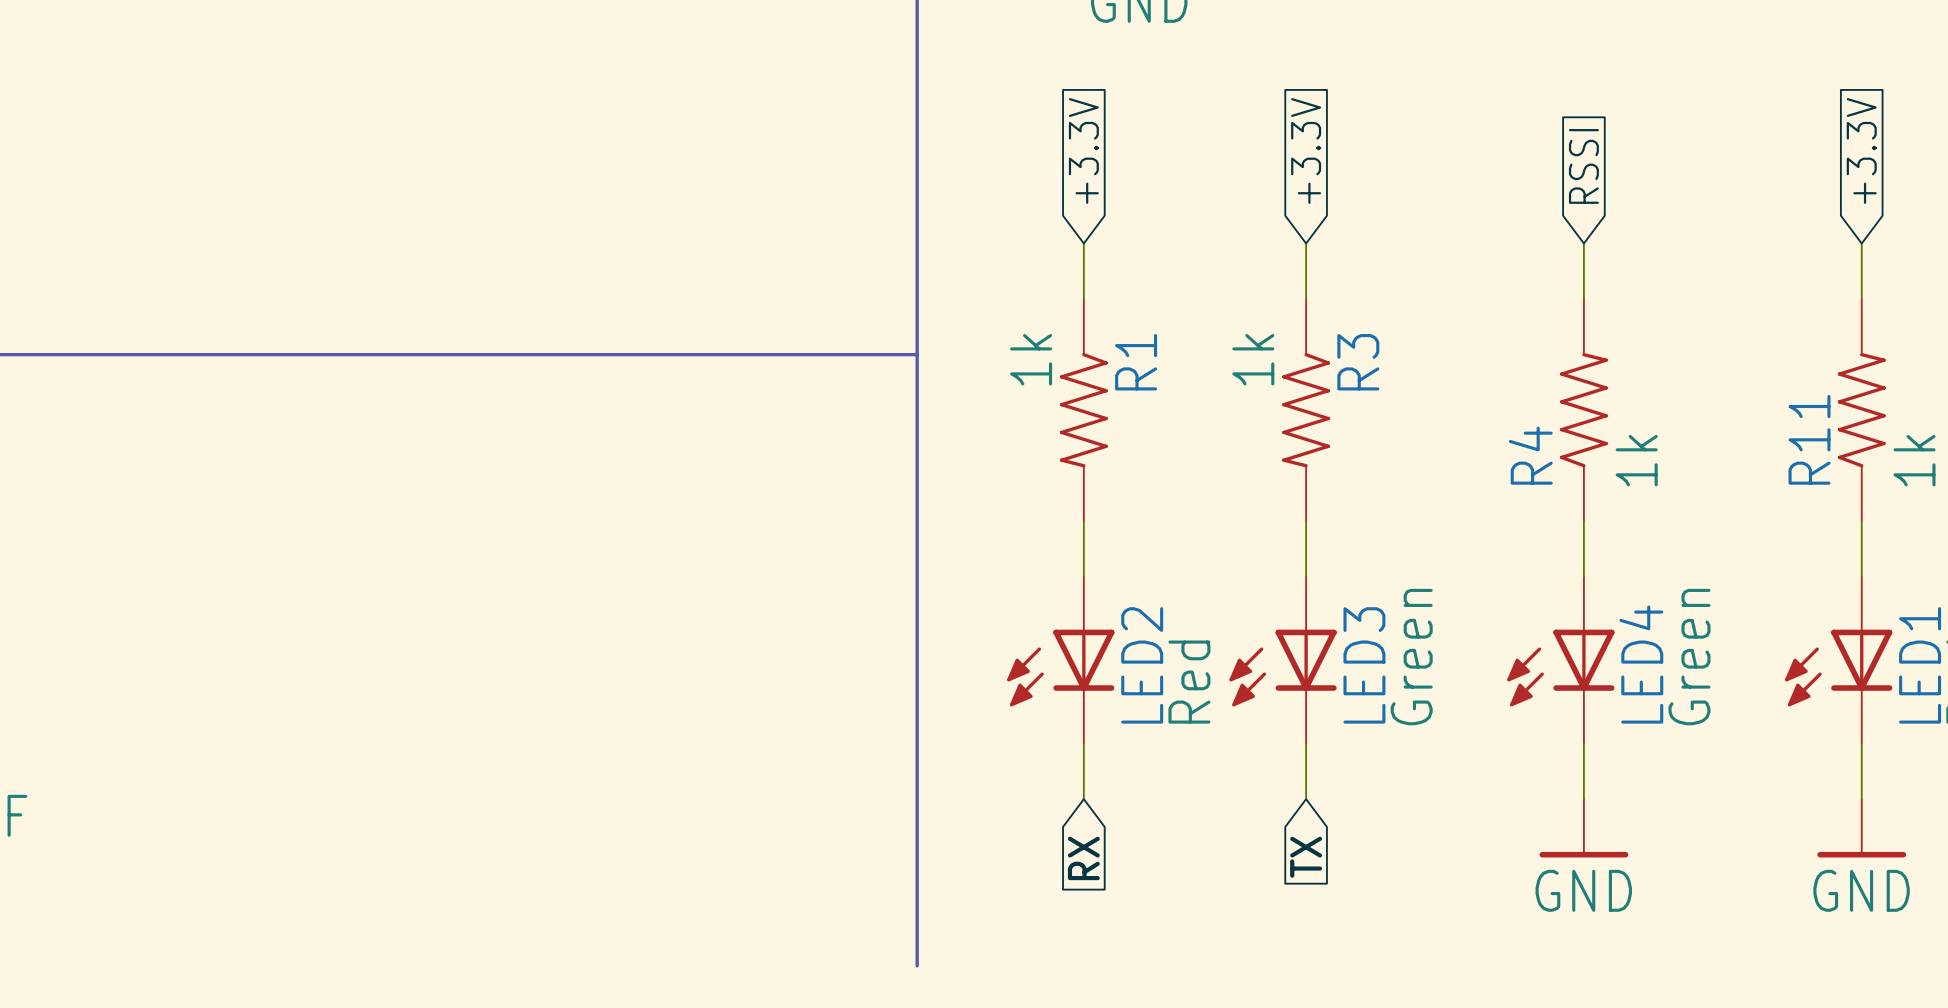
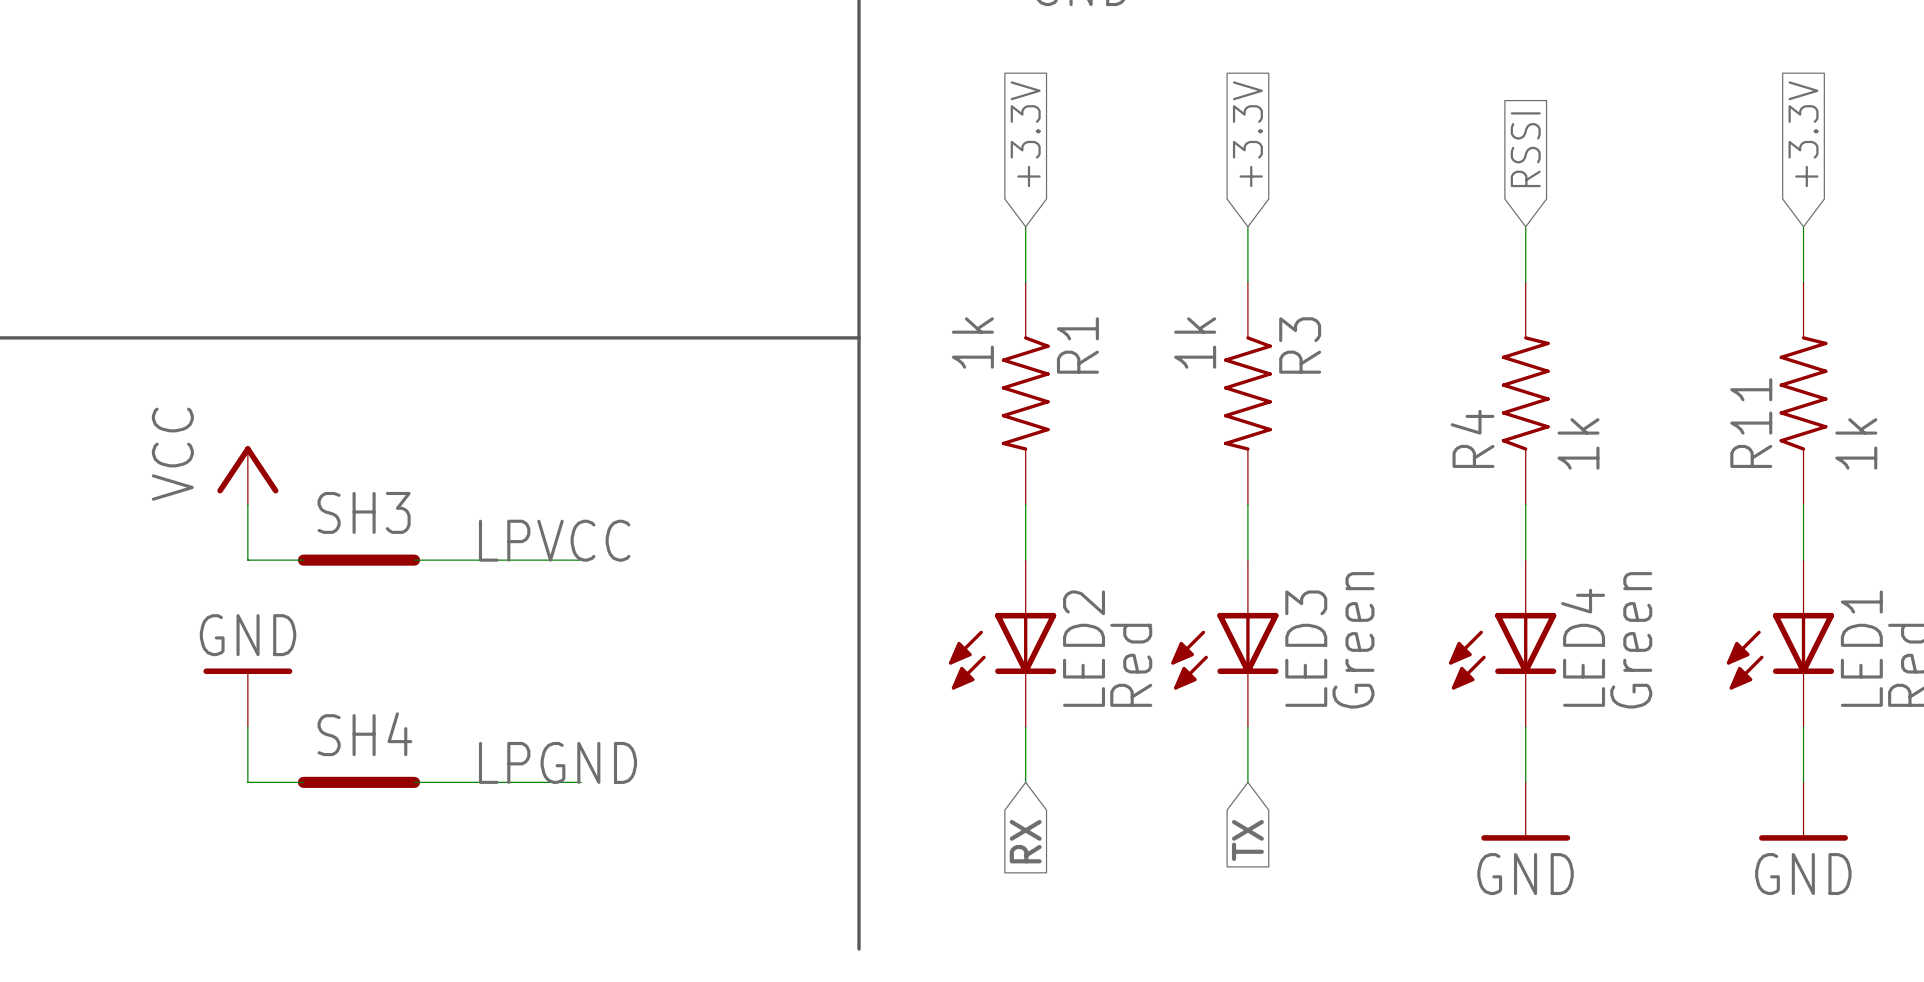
power symbol: none -> VCC (247, 475)
wire: none -> (247, 504) (247, 560) (303, 560)
label: none -> LPVCC (554, 540)
SH3: none -> (358, 560)
wire: none -> (414, 560) (581, 560)
power symbol: none -> GND (247, 697)
wire: none -> (247, 726) (247, 782) (303, 782)
label: none -> LPGND (557, 762)
SH4: none -> (358, 782)
wire: none -> (414, 782) (581, 782)

